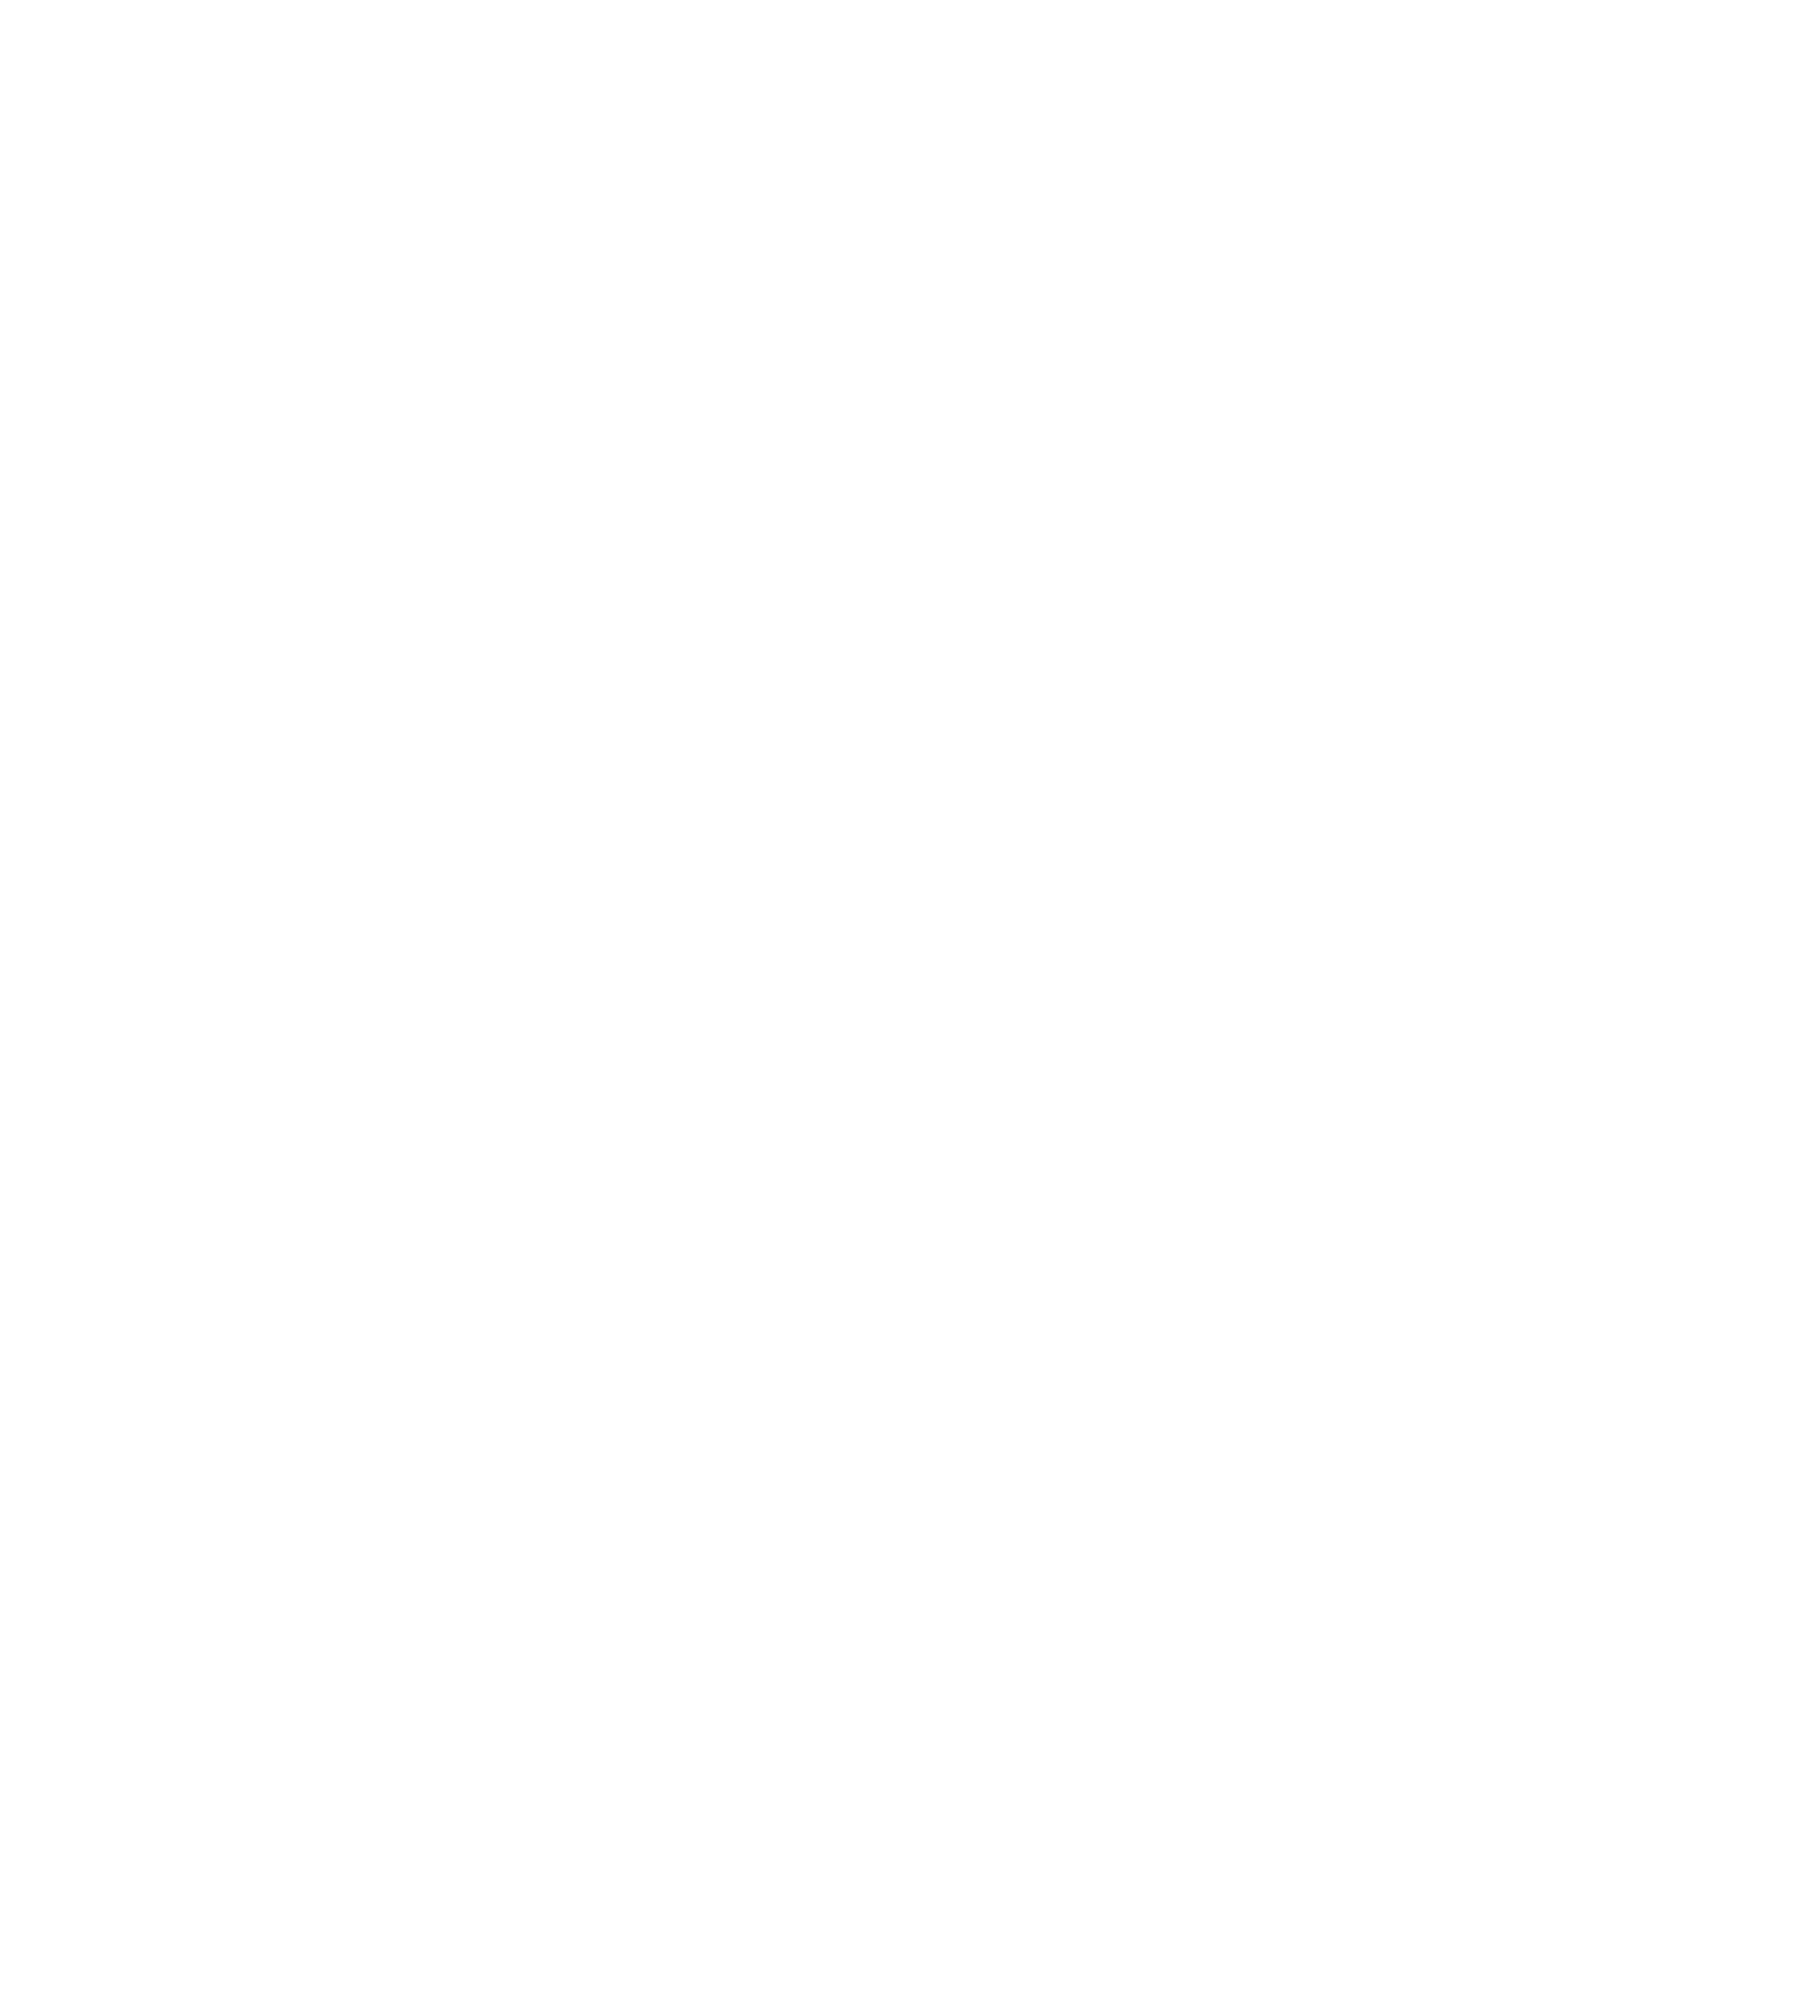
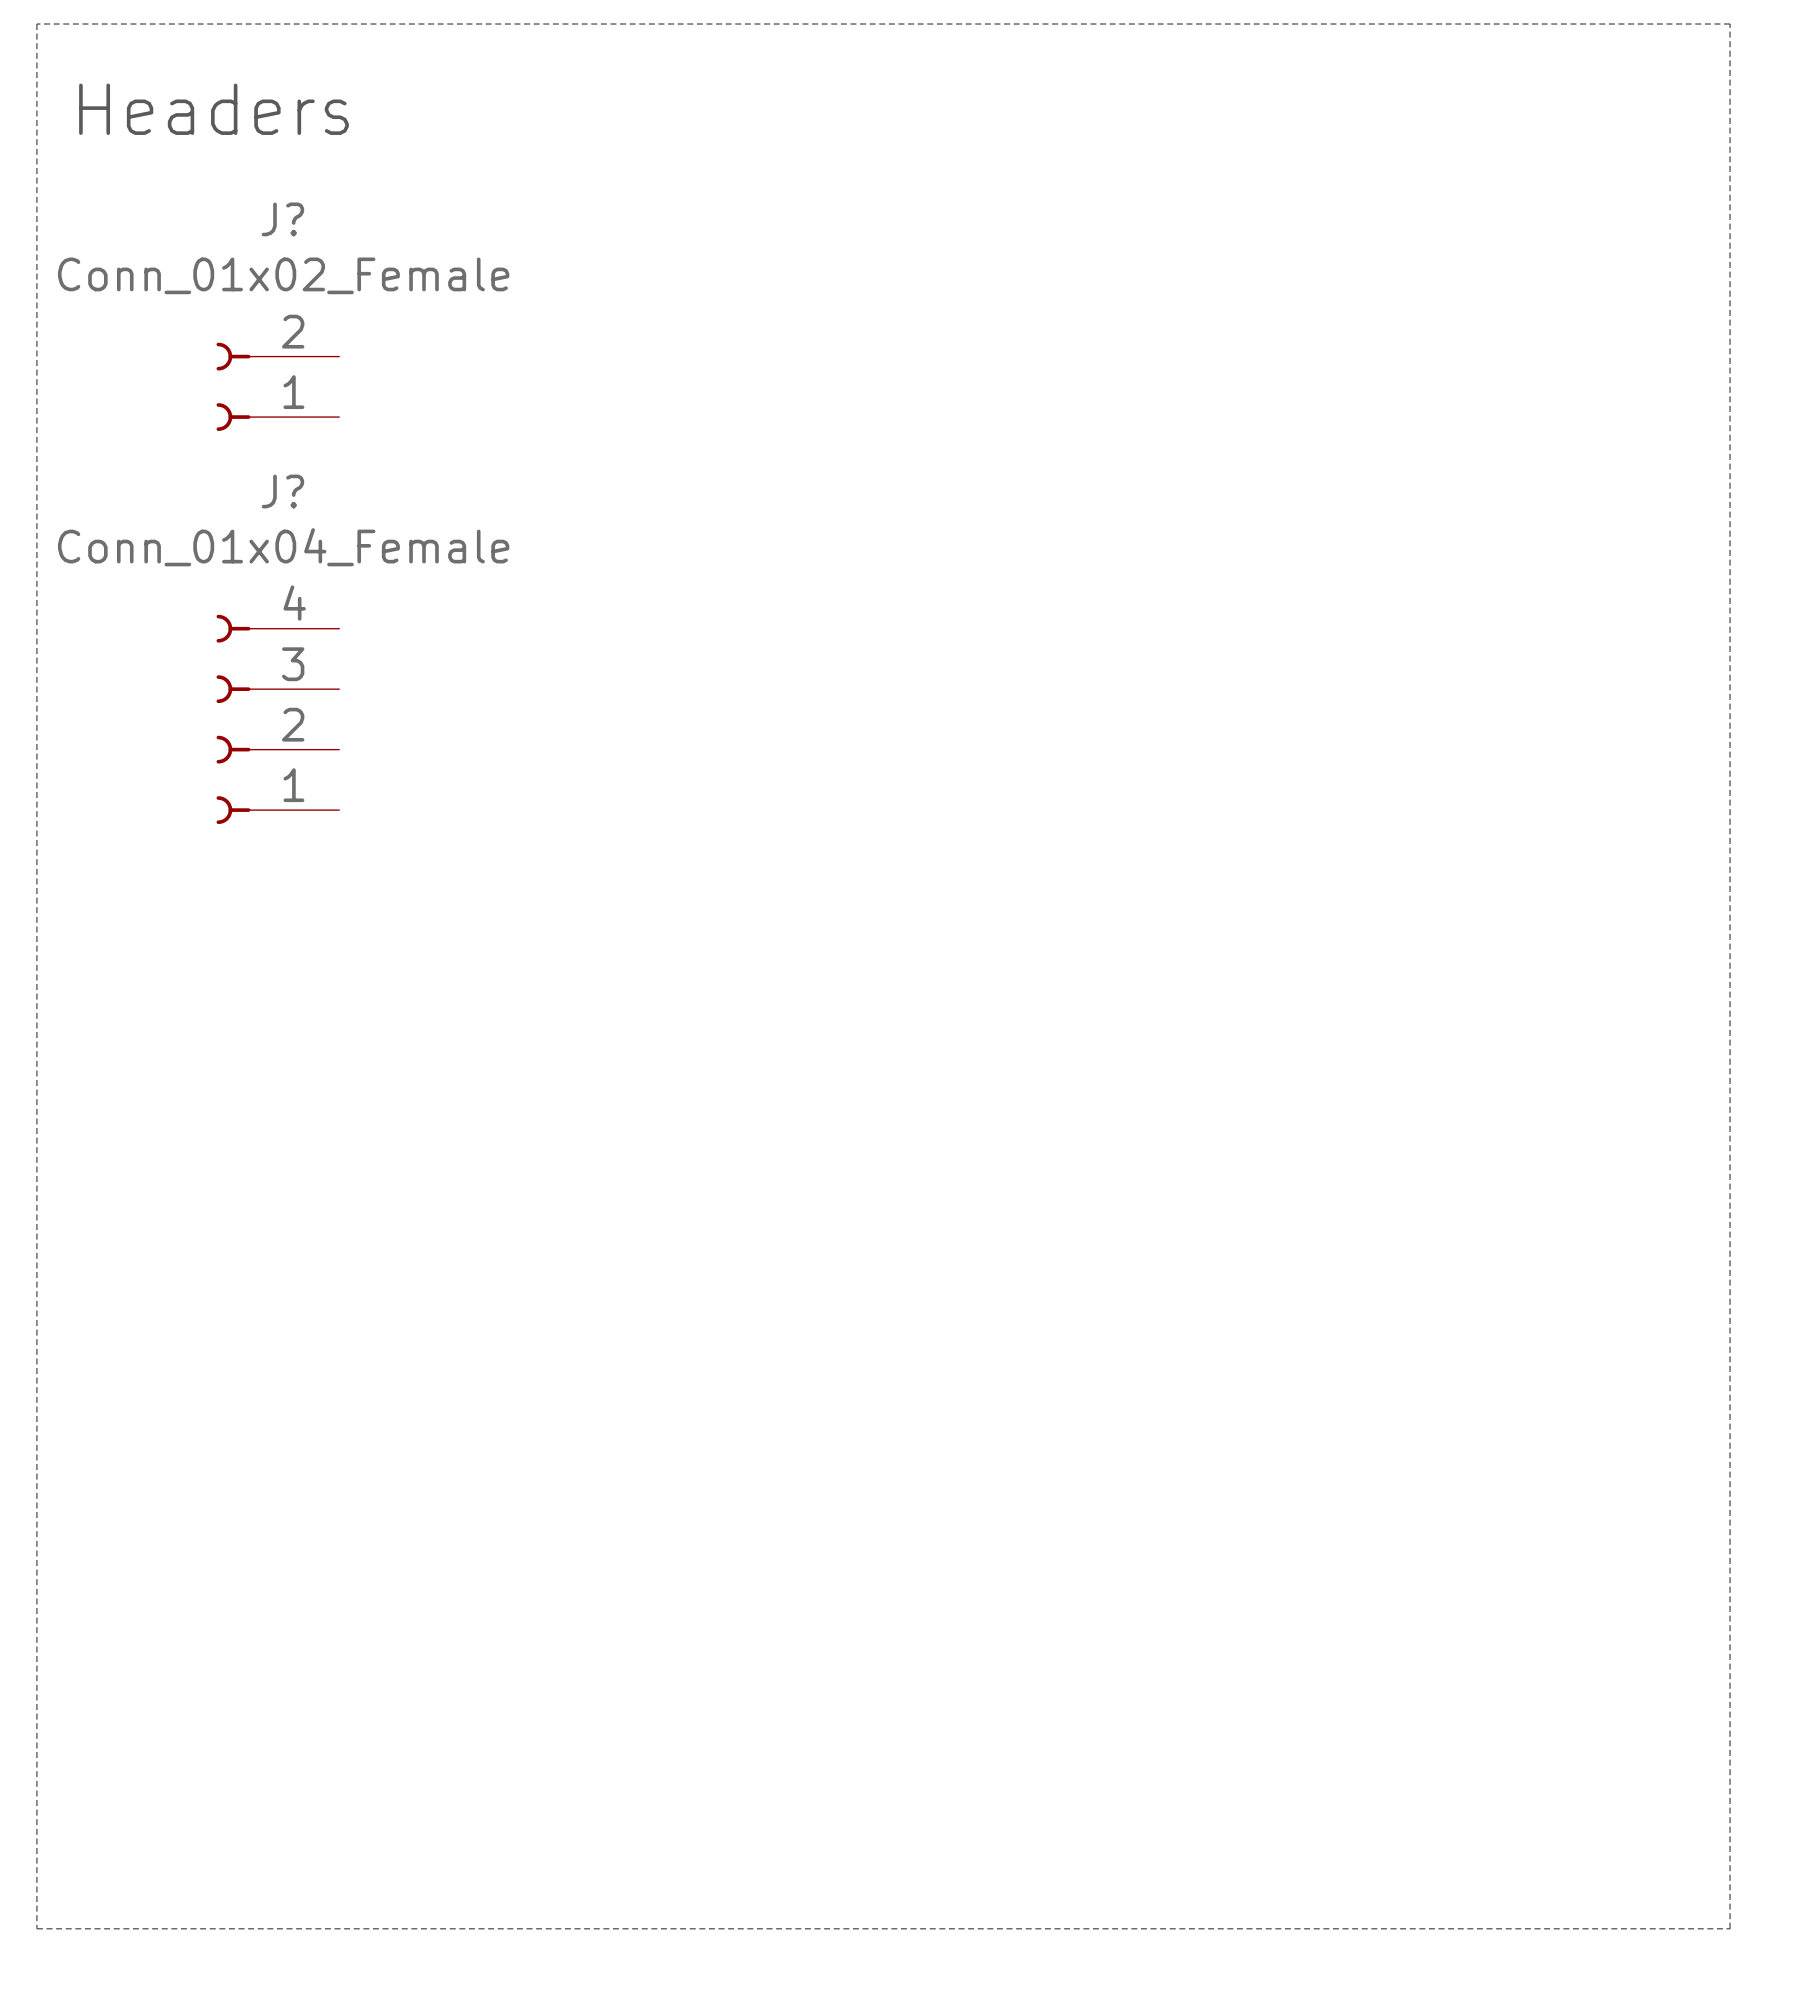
line: none -> (36, 24) (36, 1928) (1730, 1928) (1730, 24) (36, 24)
text: none -> Headers (213, 109)
J?: none -> Conn_01x02_Female (277, 386)
J?: none -> Conn_01x04_Female (277, 719)

